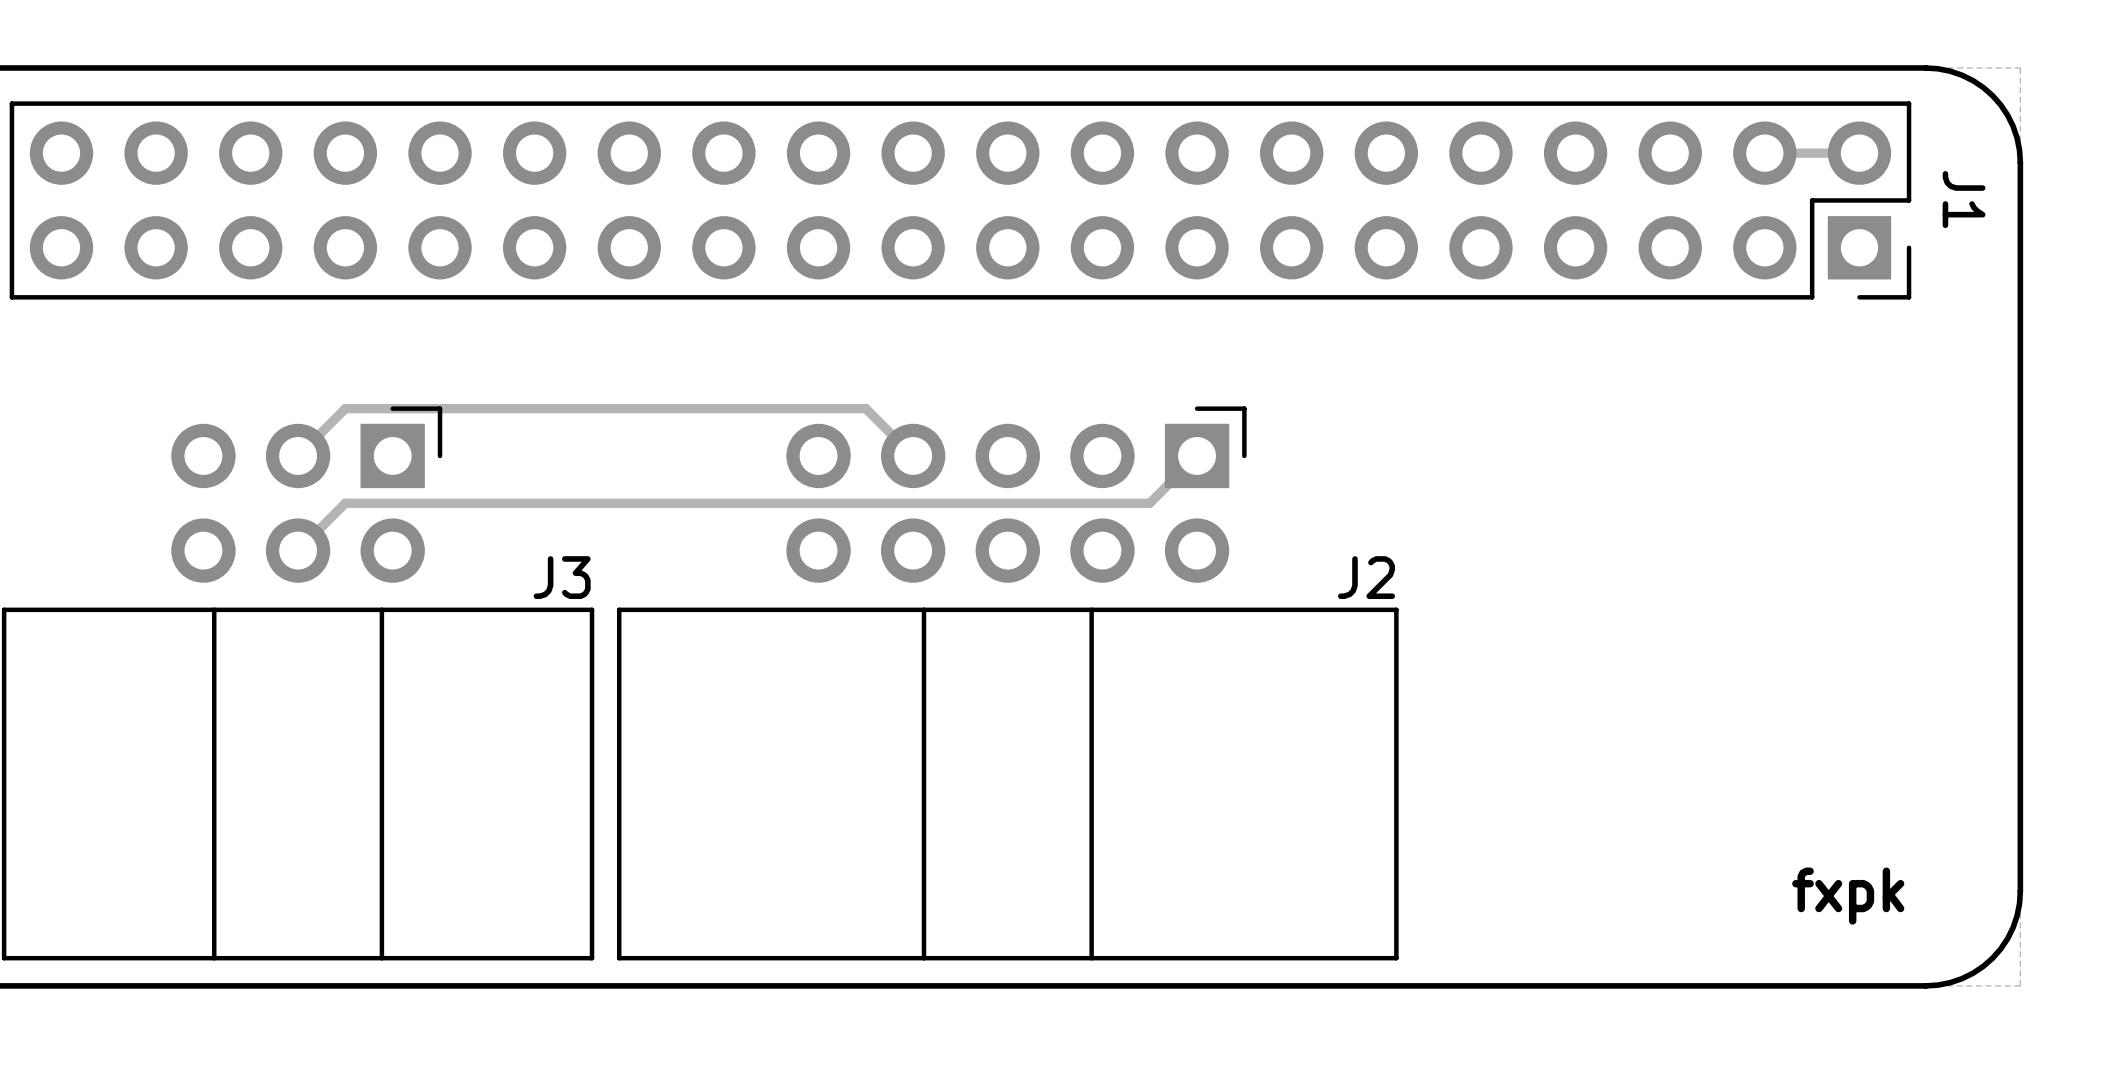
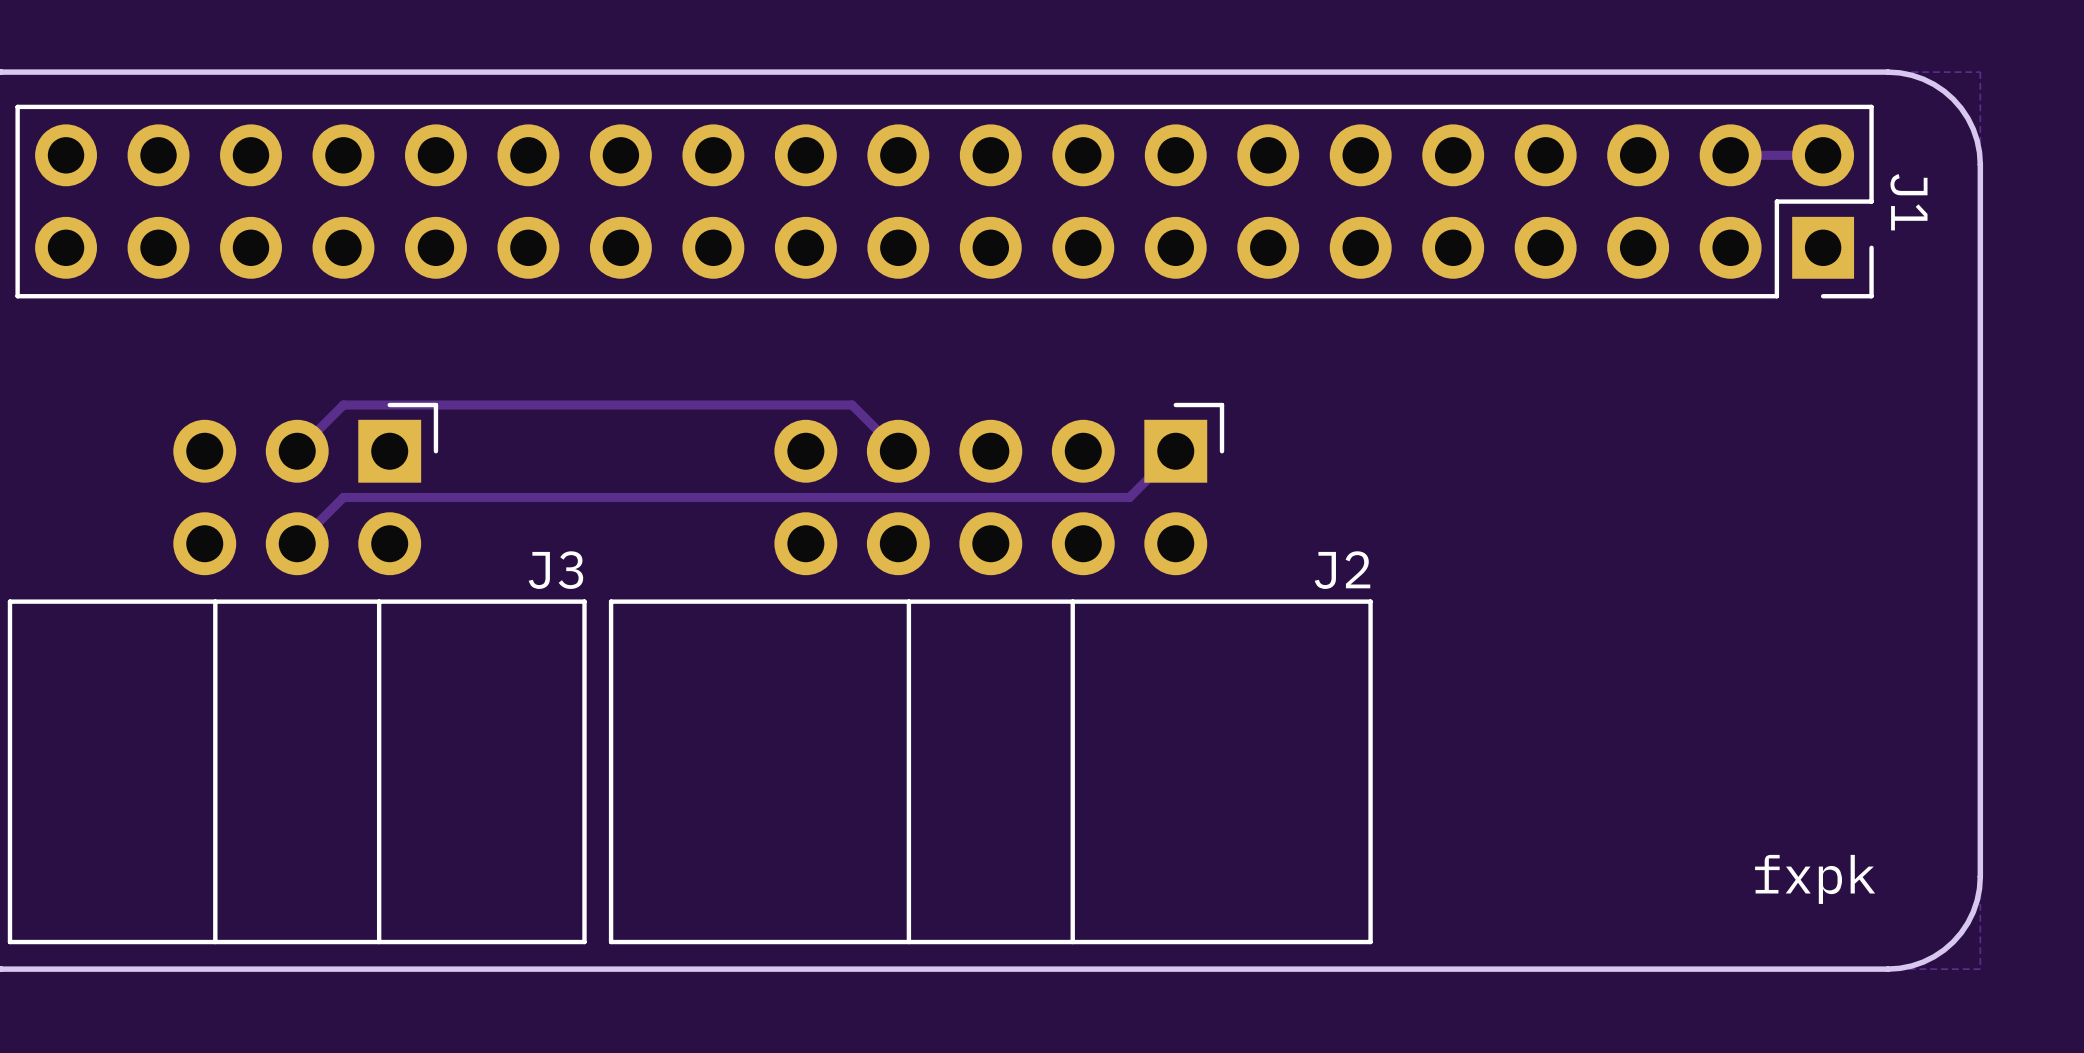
J1 name position: J1 (1964, 199) -> J1 (1908, 202)

